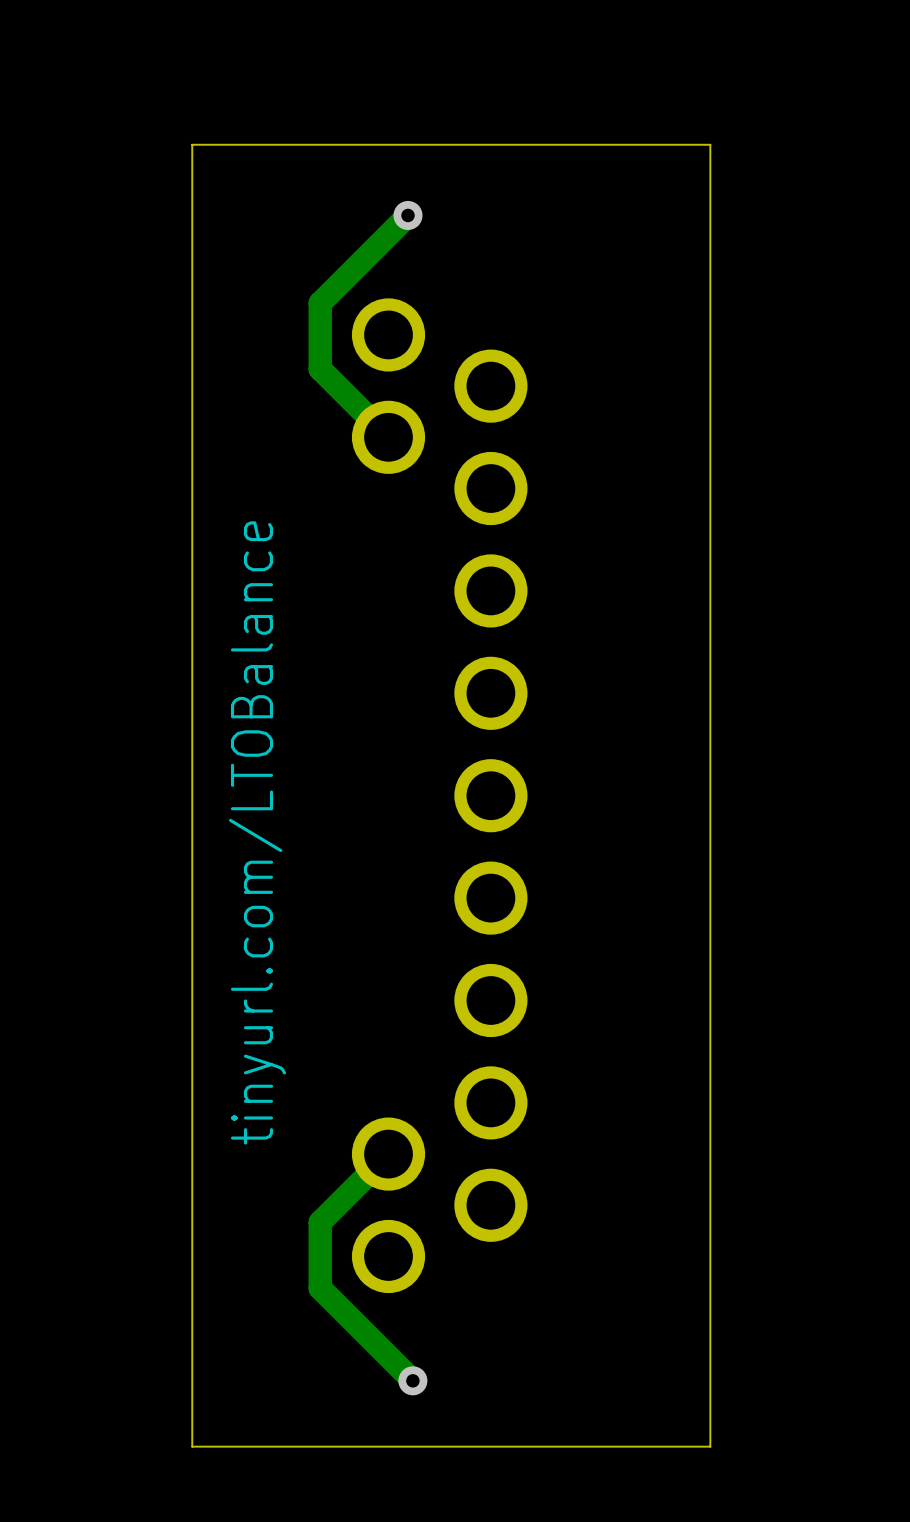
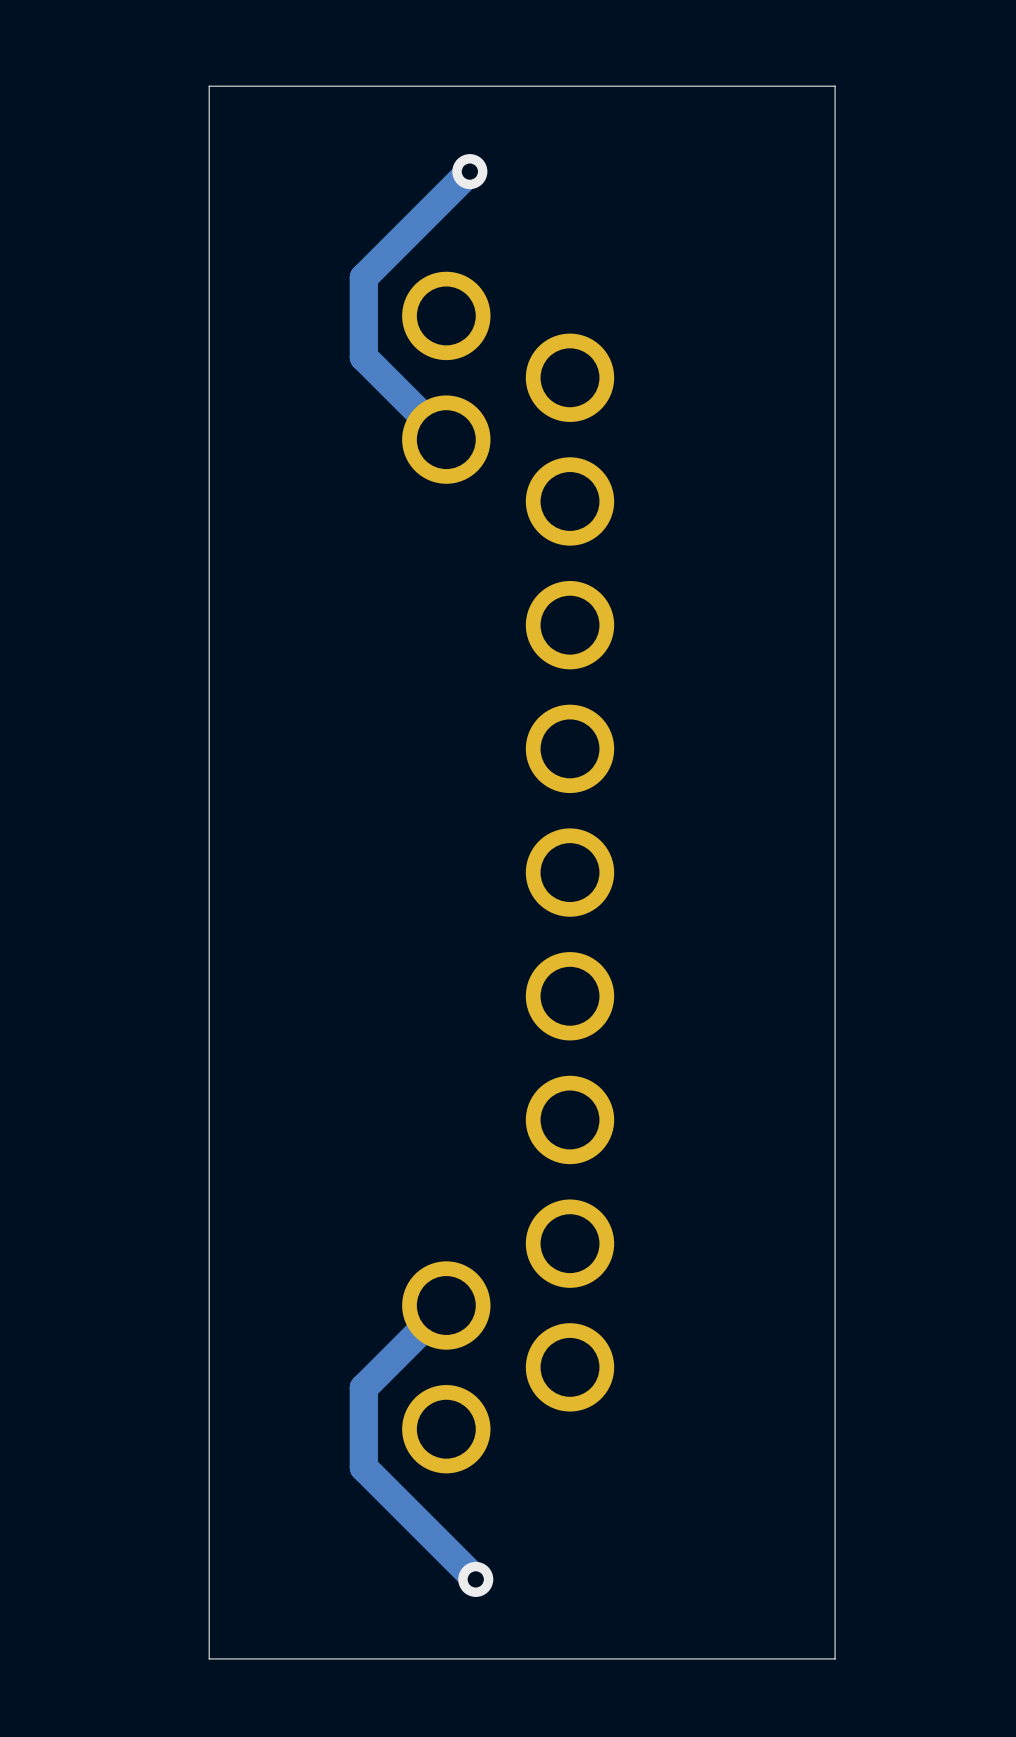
text: tinyurl.com/LTOBalance (257, 832) -> none

